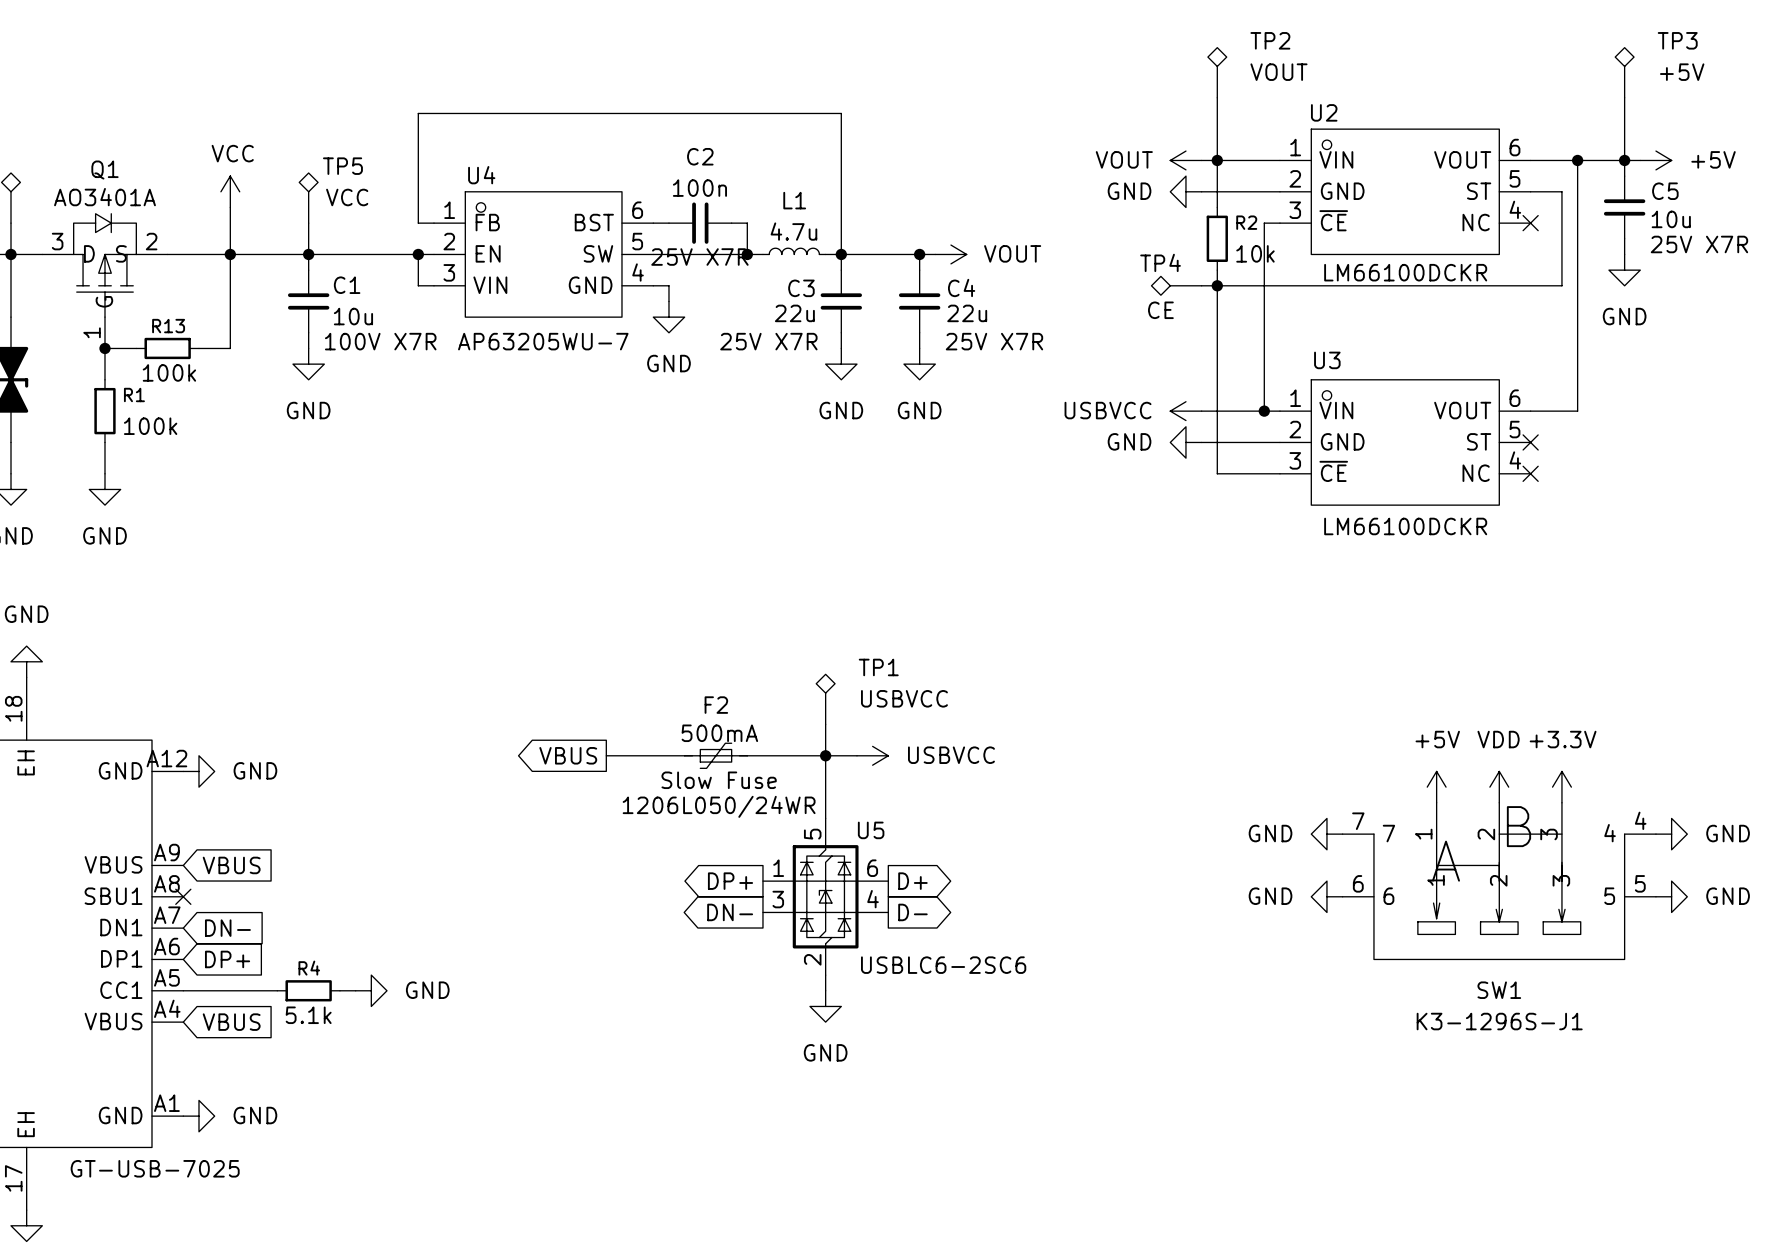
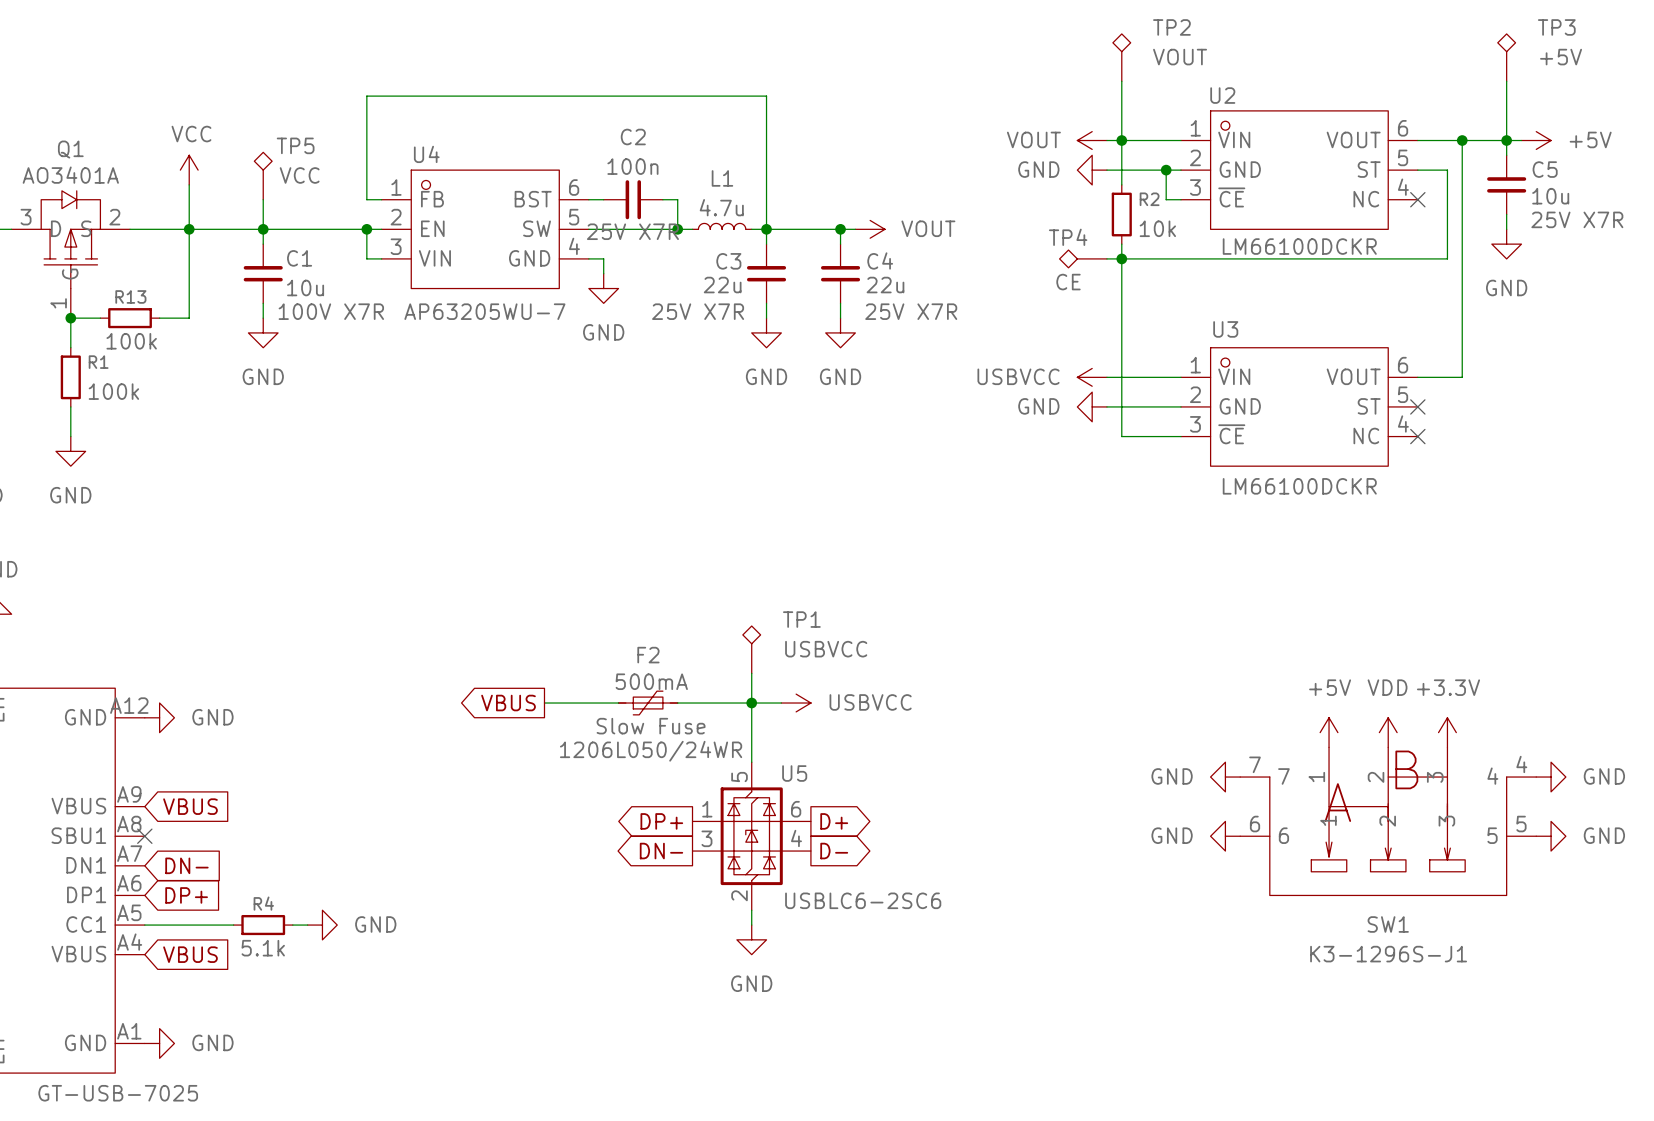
junction: none -> (1166, 170)
wire: (1264, 223) (1264, 411) -> (1166, 199) (1166, 170)
junction: (1264, 411) -> none

